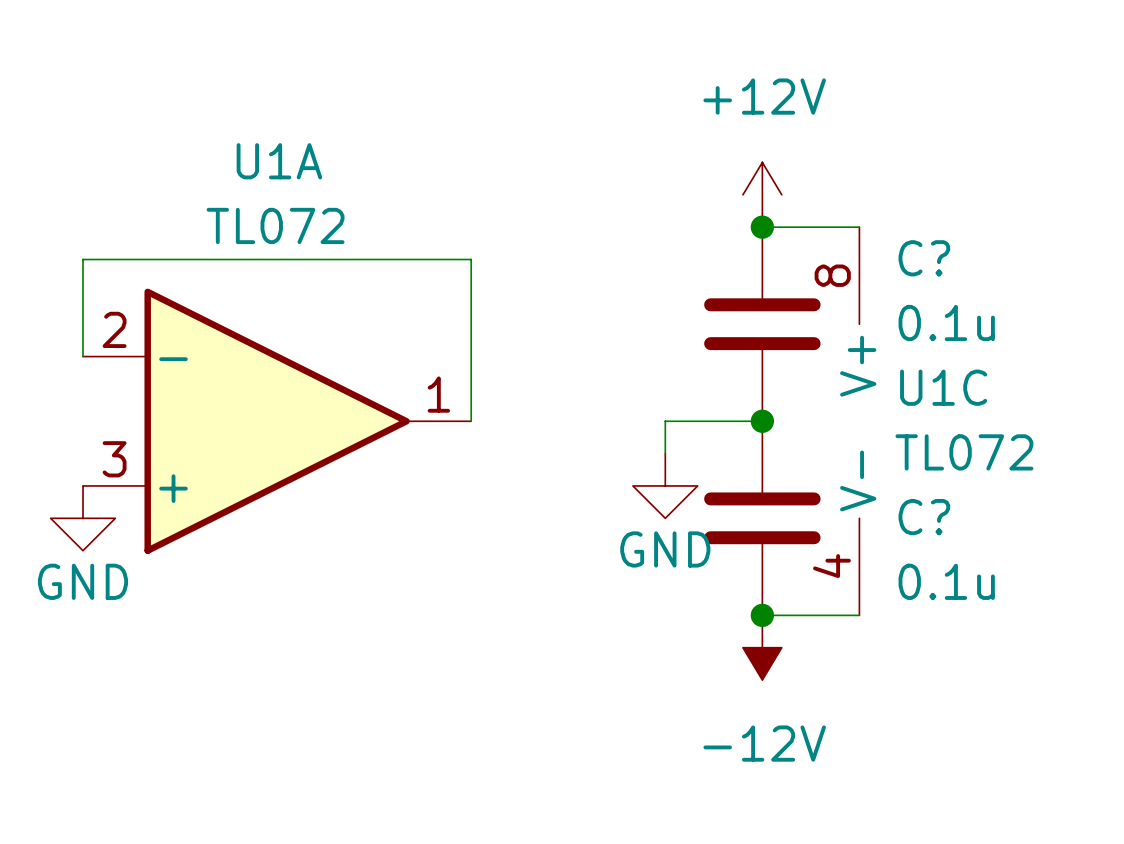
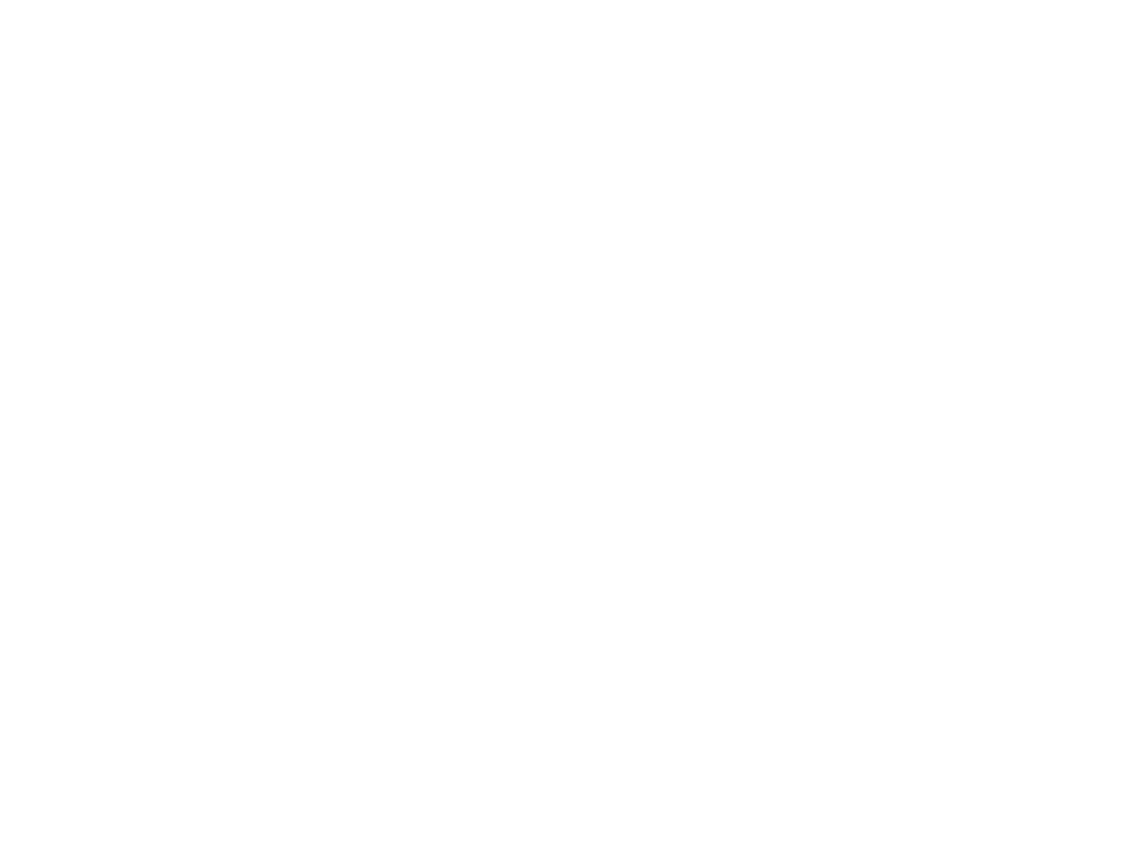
power symbol: +12V (762, 194) -> none
wire: (762, 227) (859, 227) -> none
junction: (762, 227) -> none
C?: 0.1u (762, 324) -> none
wire: (82, 356) (82, 259) (471, 259) (471, 421) -> none
U1A: TL072 (277, 421) -> none
wire: (762, 421) (665, 421) (665, 453) -> none
junction: (762, 421) -> none
U1C: TL072 (859, 421) -> none
power symbol: GND (665, 485) -> none
power symbol: GND (82, 518) -> none
C?: 0.1u (762, 518) -> none
wire: (762, 615) (859, 615) -> none
junction: (762, 615) -> none
power symbol: -12V (762, 647) -> none

